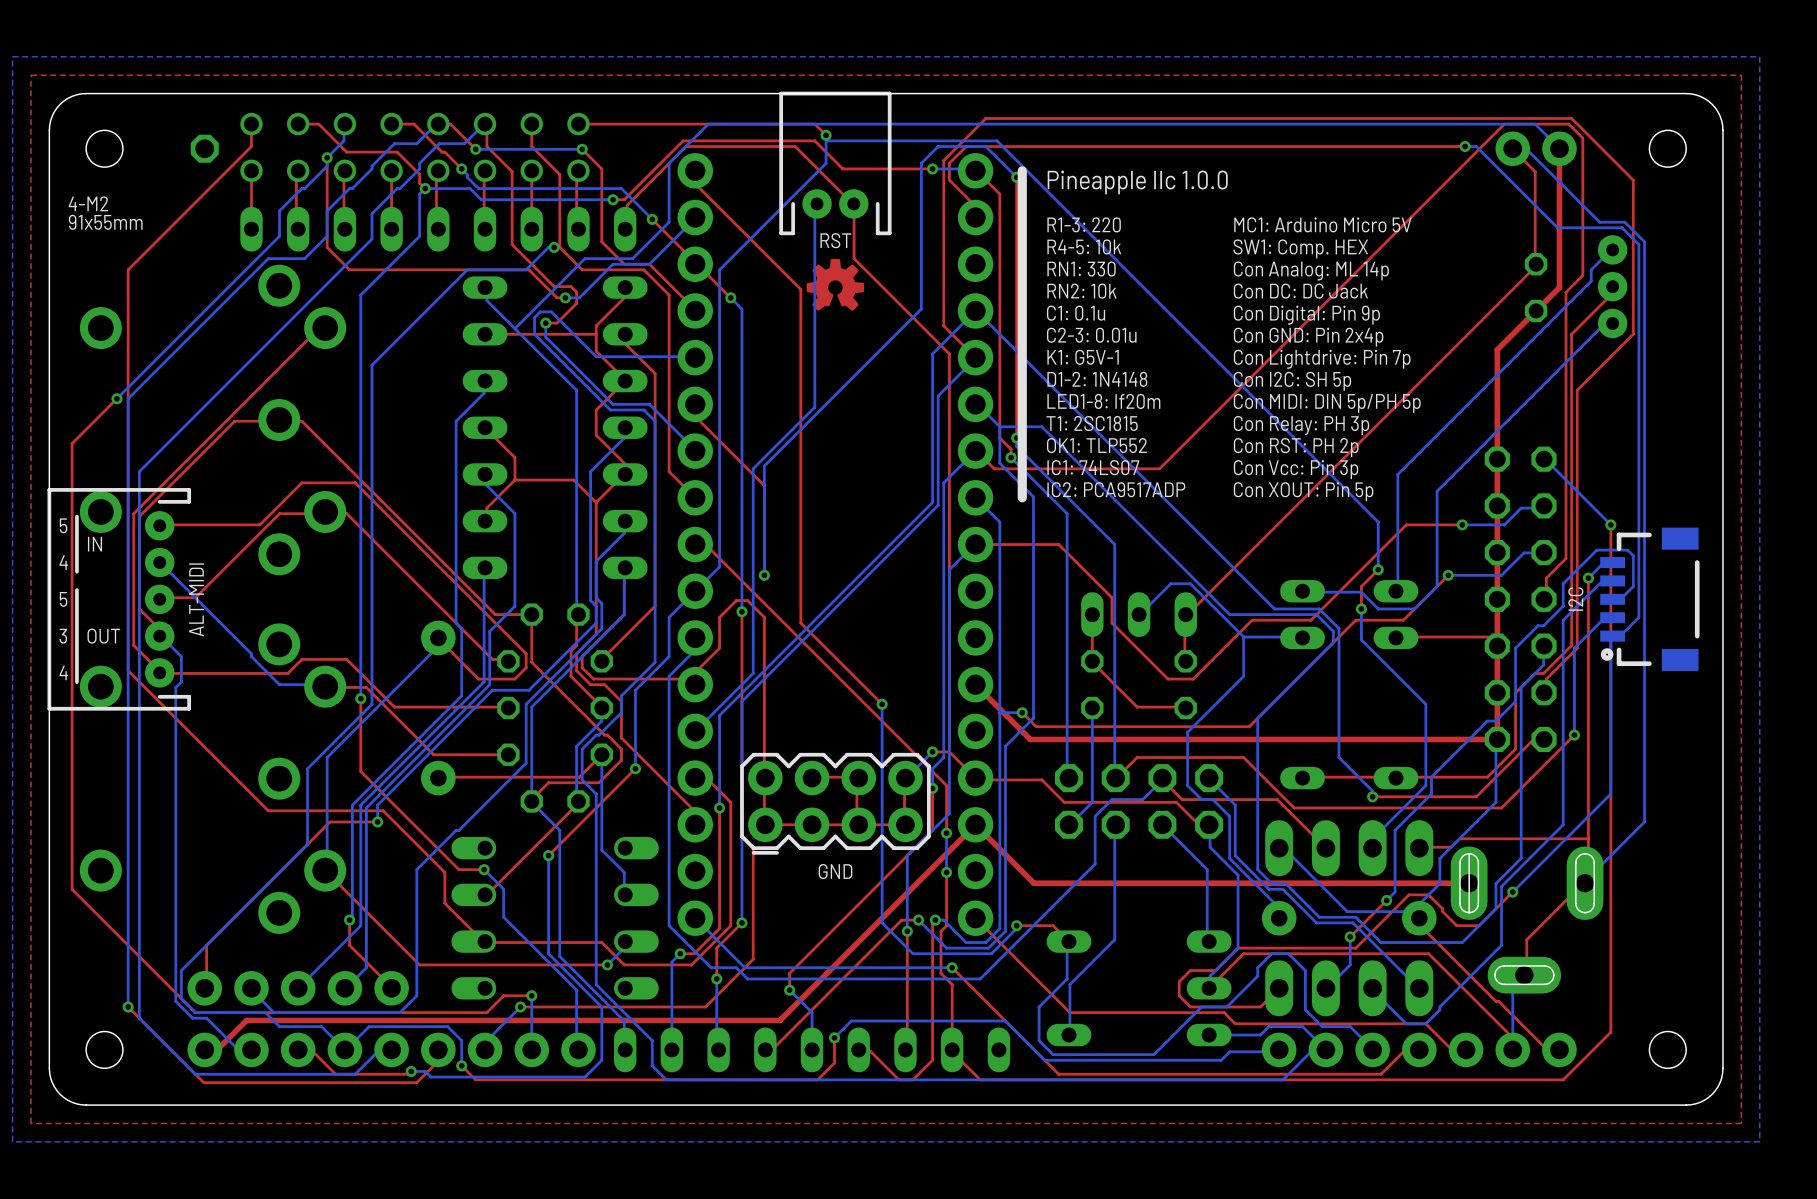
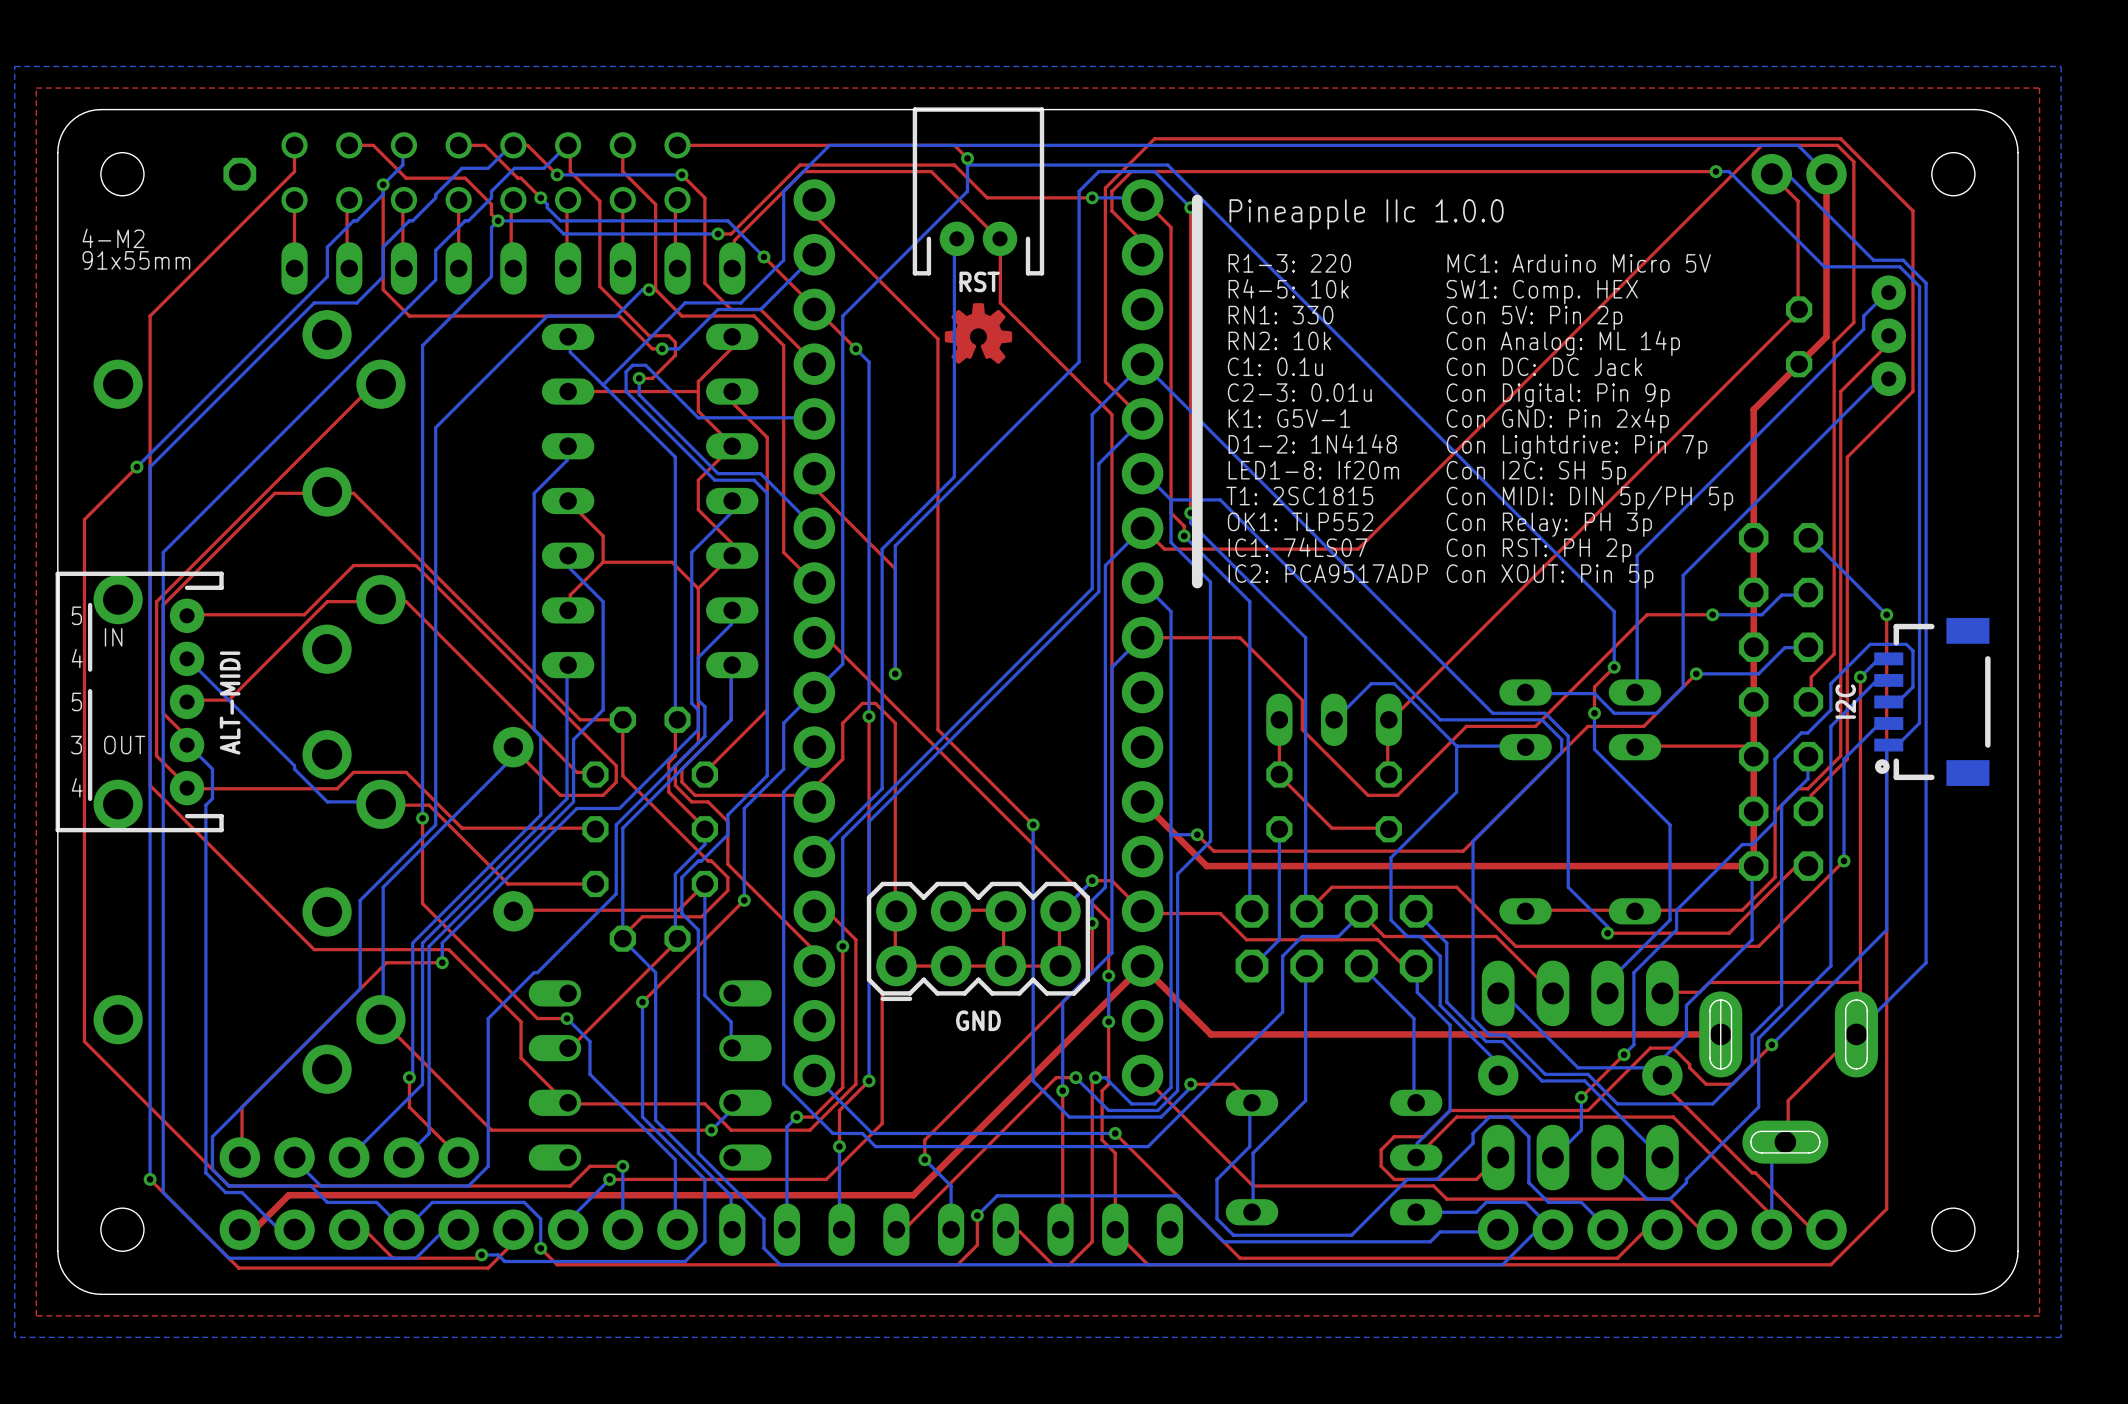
text: Con Analog: ML 14p (1311, 271) -> Con 5V: Pin 2p (1534, 317)
text: Con DC: DC Jack (1300, 291) -> Con Analog: ML 14p (1563, 343)
text: Con Digital: Pin 9p (1306, 315) -> Con DC: DC Jack (1544, 366)
text: Con GND: Pin 2x4p (1308, 337) -> Con Digital: Pin 9p (1558, 395)
text: Con Lightdrive: Pin 7p (1322, 359) -> Con GND: Pin 2x4p (1557, 420)
text: Con I2C: SH 5p (1292, 381) -> Con Lightdrive: Pin 7p (1576, 447)
text: Con MIDI: DIN 5p/PH 5p (1327, 403) -> Con I2C: SH 5p (1536, 473)
text: Con Relay: PH 3p (1301, 425) -> Con MIDI: DIN 5p/PH 5p (1589, 498)
text: Con RST: PH 2p (1296, 447) -> Con Relay: PH 3p (1549, 524)
text: Con Vcc: Pin 3p (1296, 469) -> Con RST: PH 2p (1538, 550)

